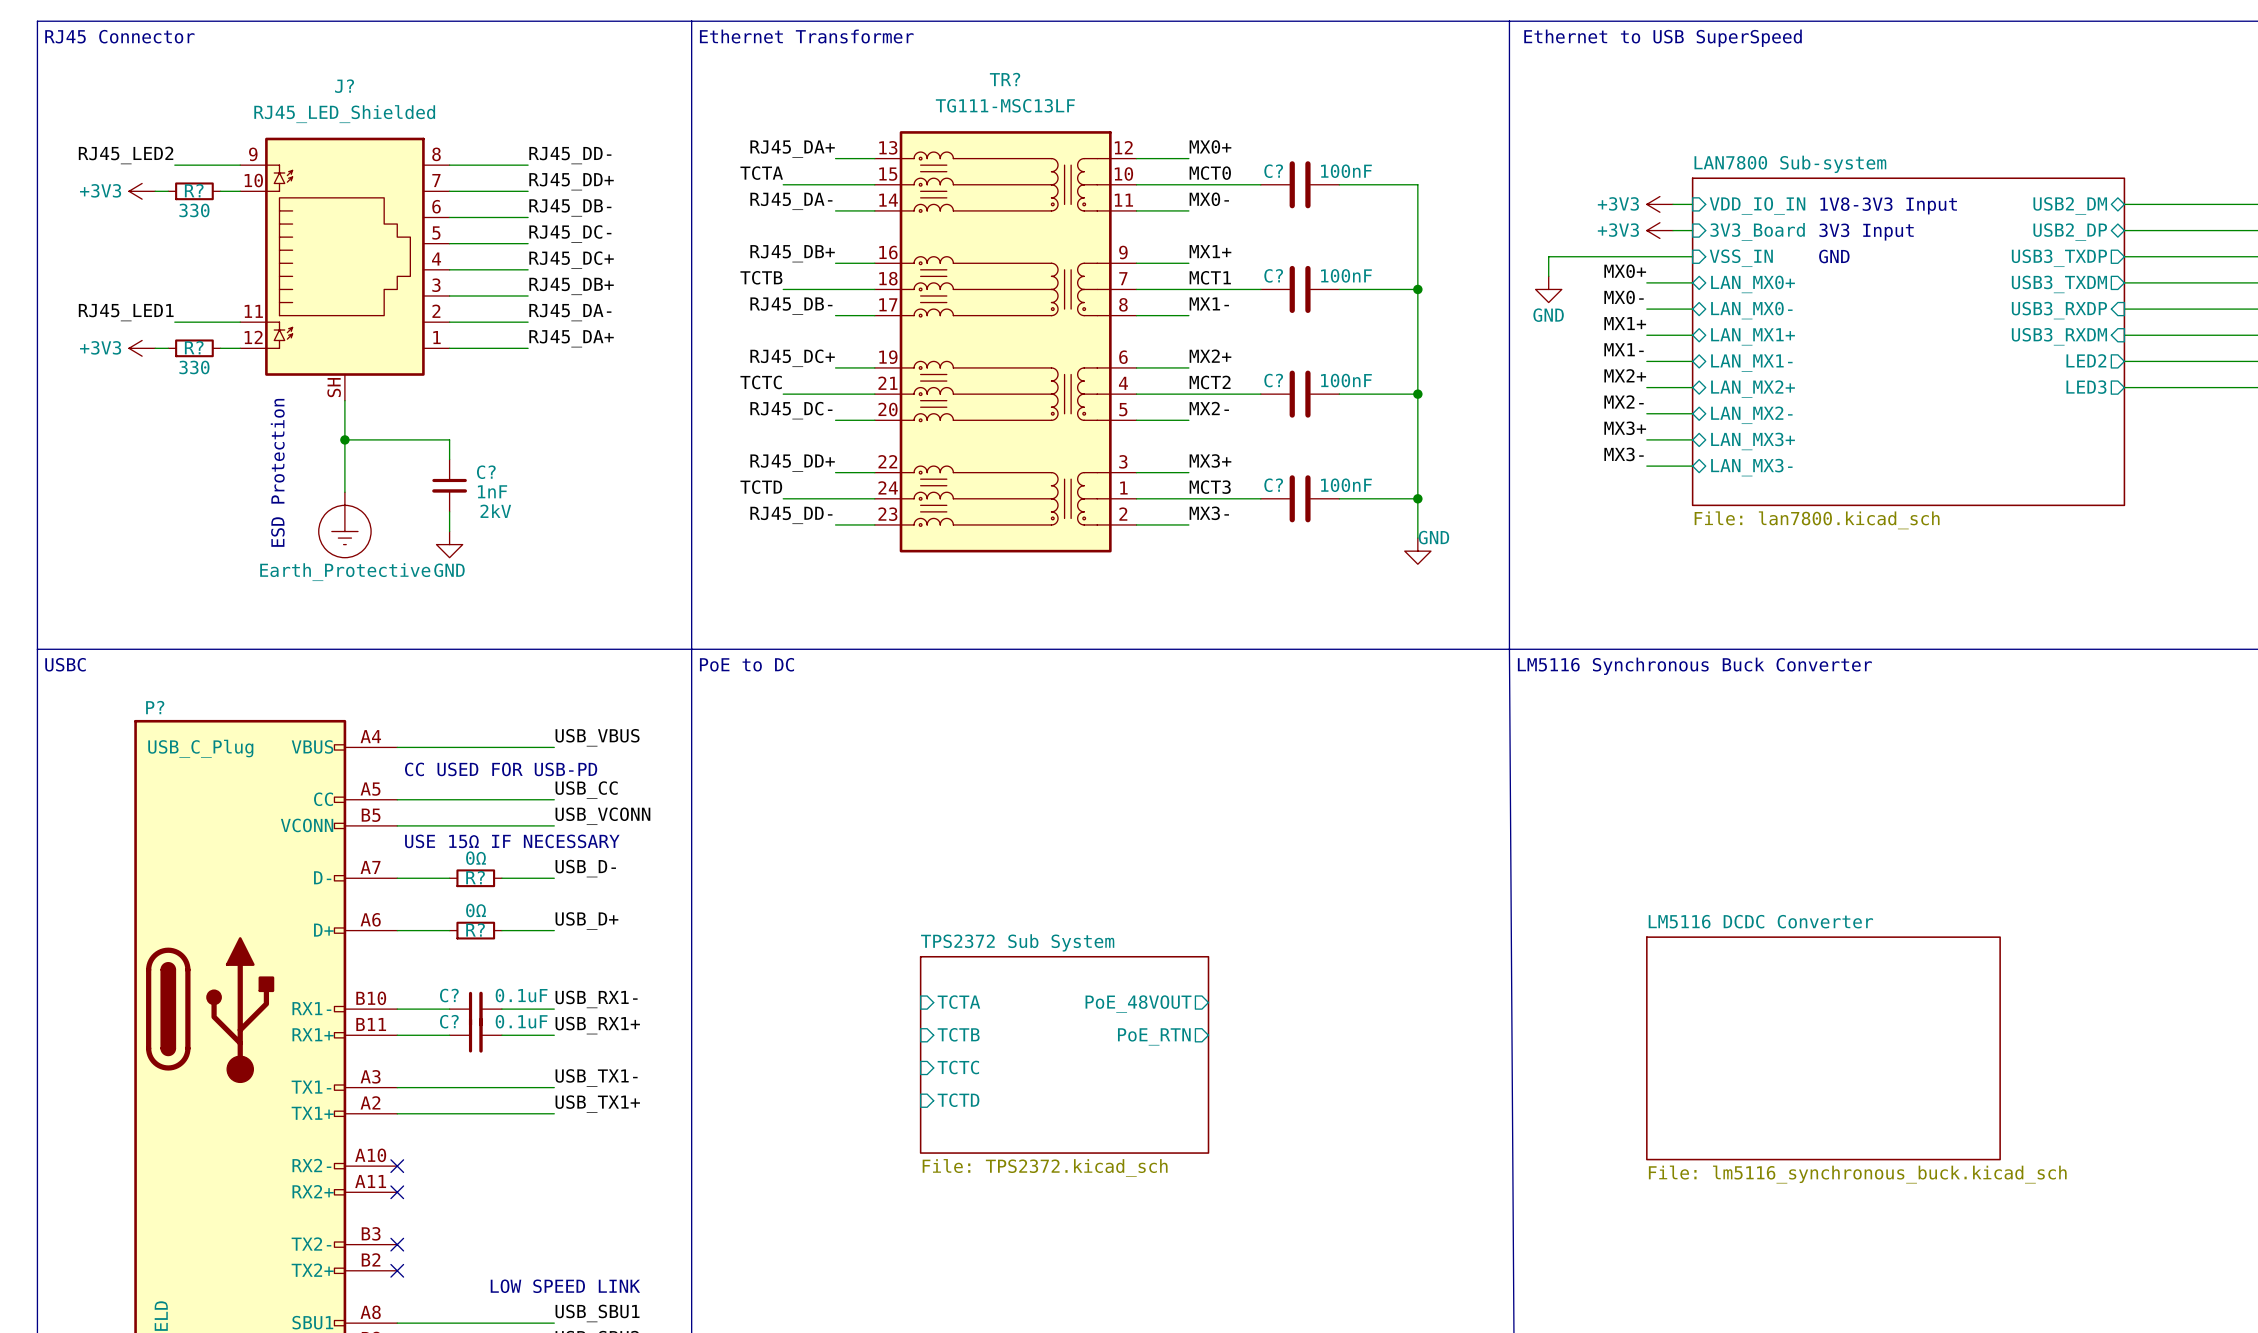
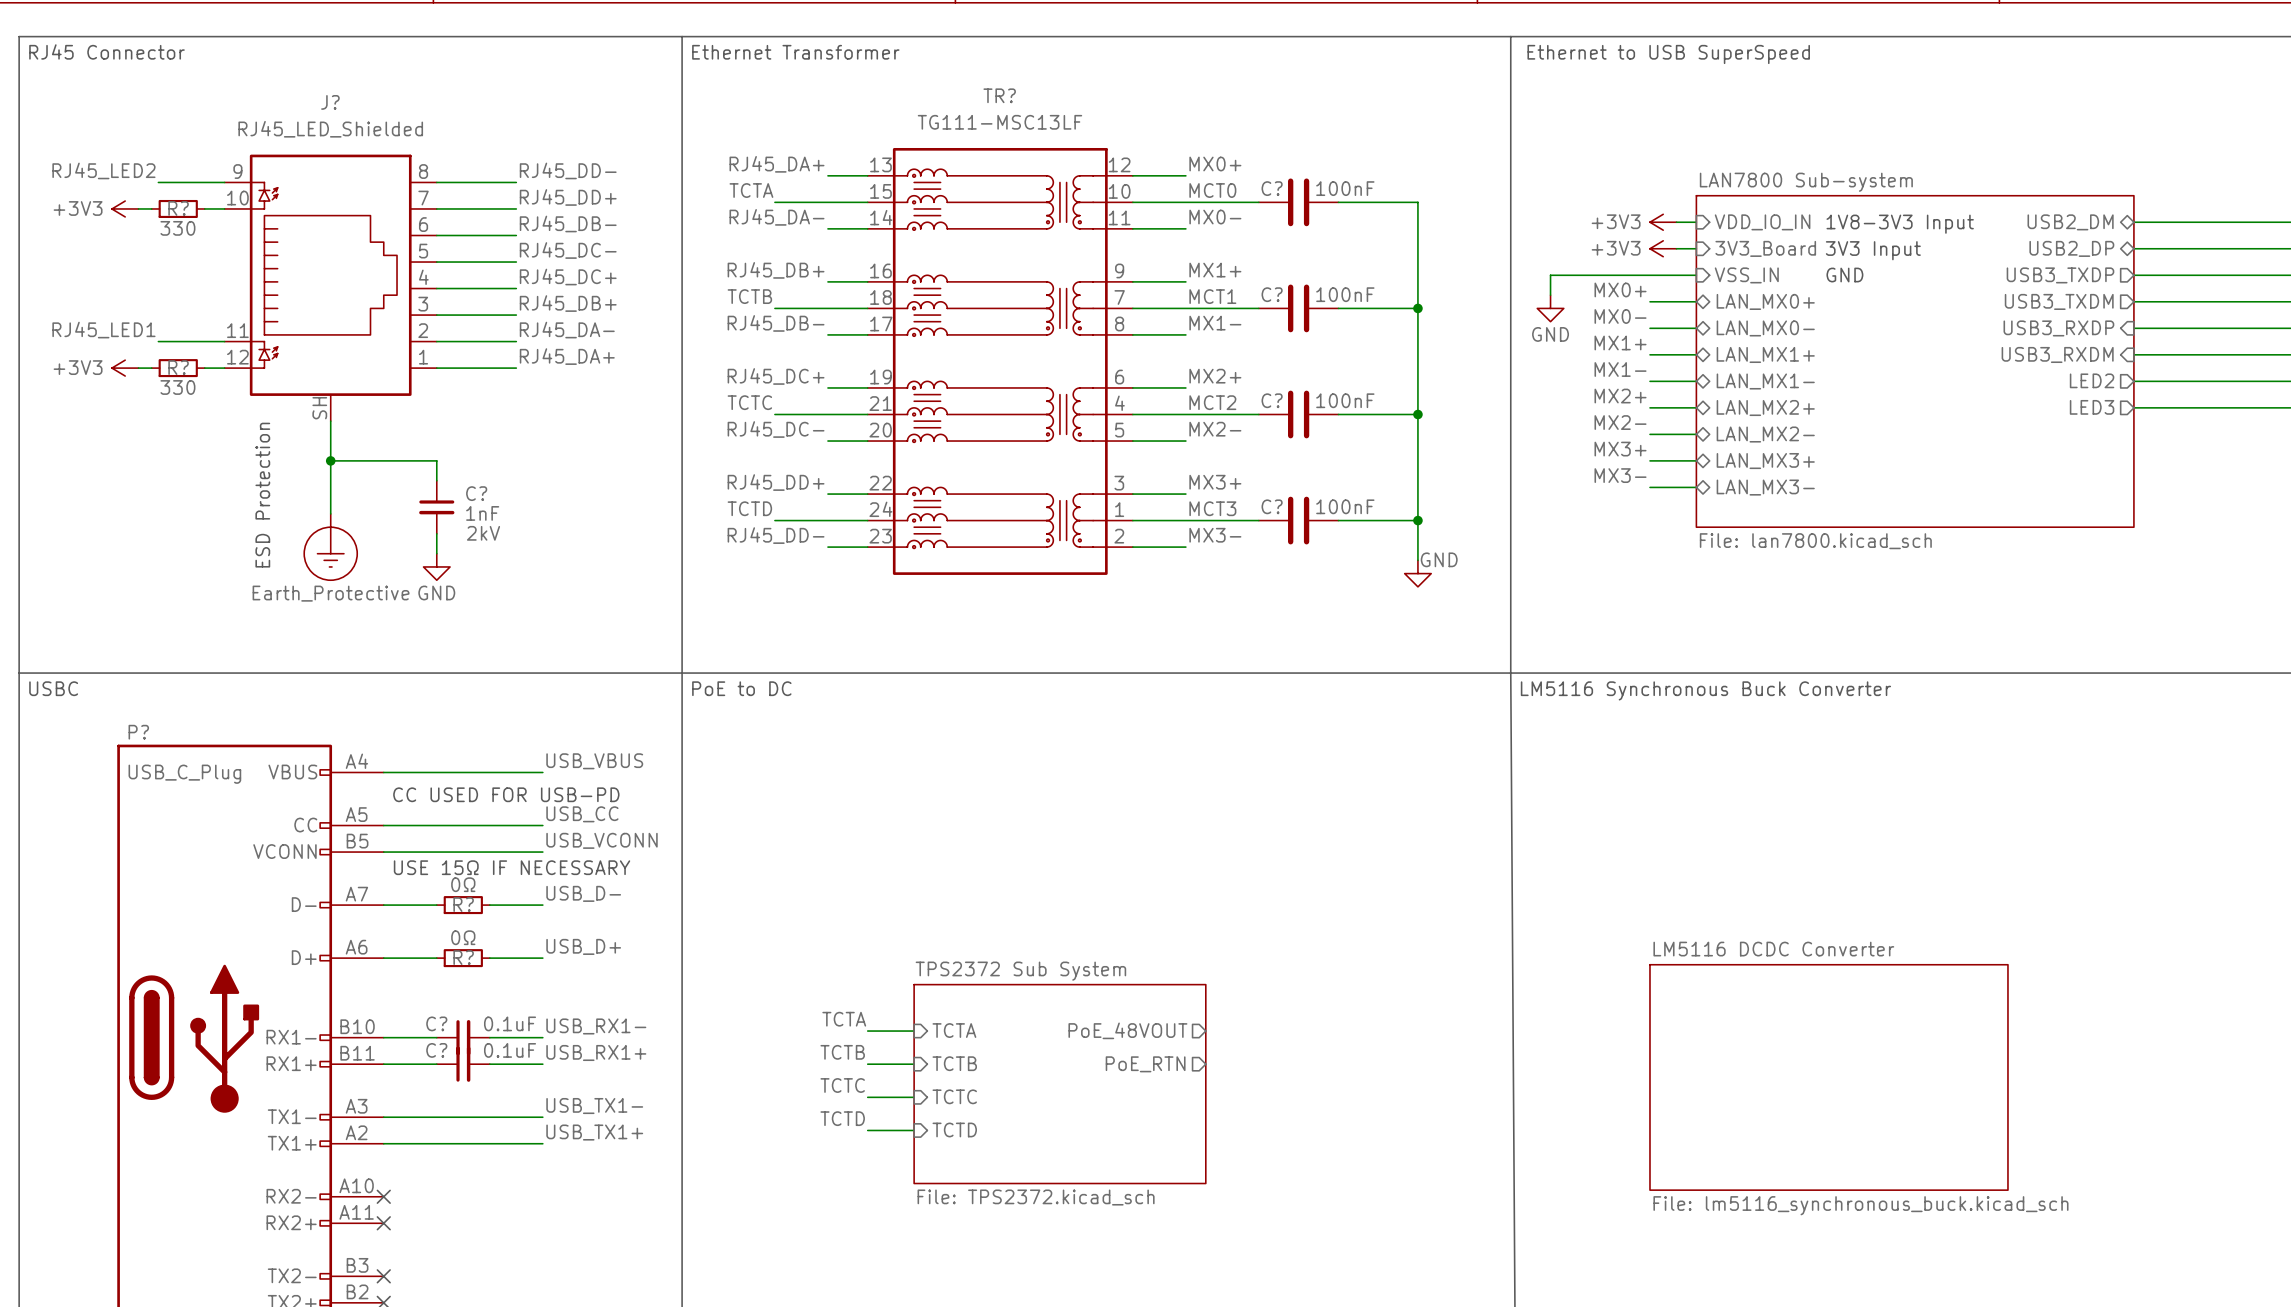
label: none -> TCTA (844, 1019)
wire: none -> (867, 1031) (914, 1031)
label: none -> TCTB (842, 1052)
wire: none -> (867, 1064) (914, 1064)
label: none -> TCTC (842, 1085)
wire: none -> (867, 1097) (914, 1097)
label: none -> TCTD (842, 1118)
wire: none -> (867, 1130) (914, 1130)

